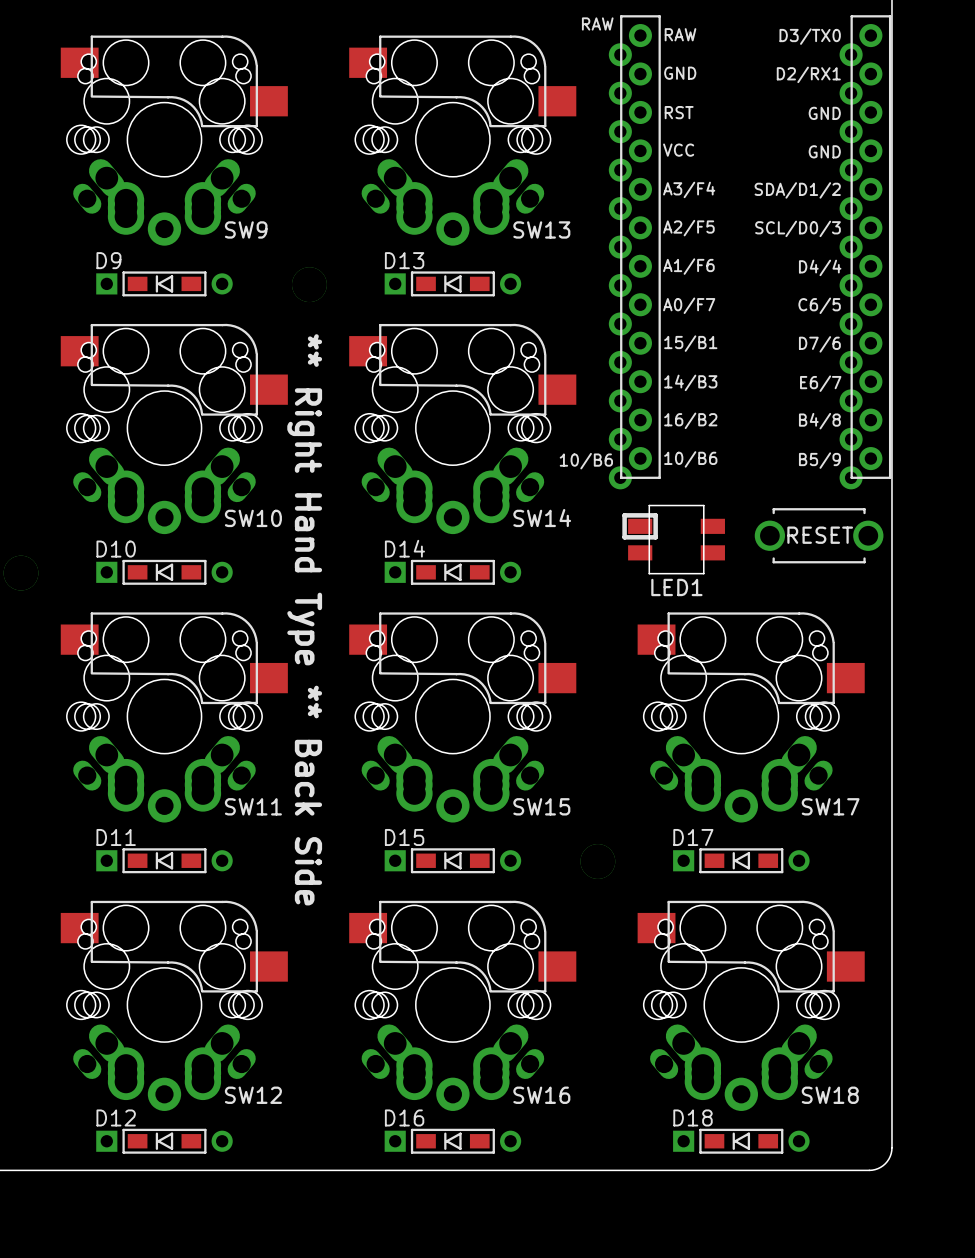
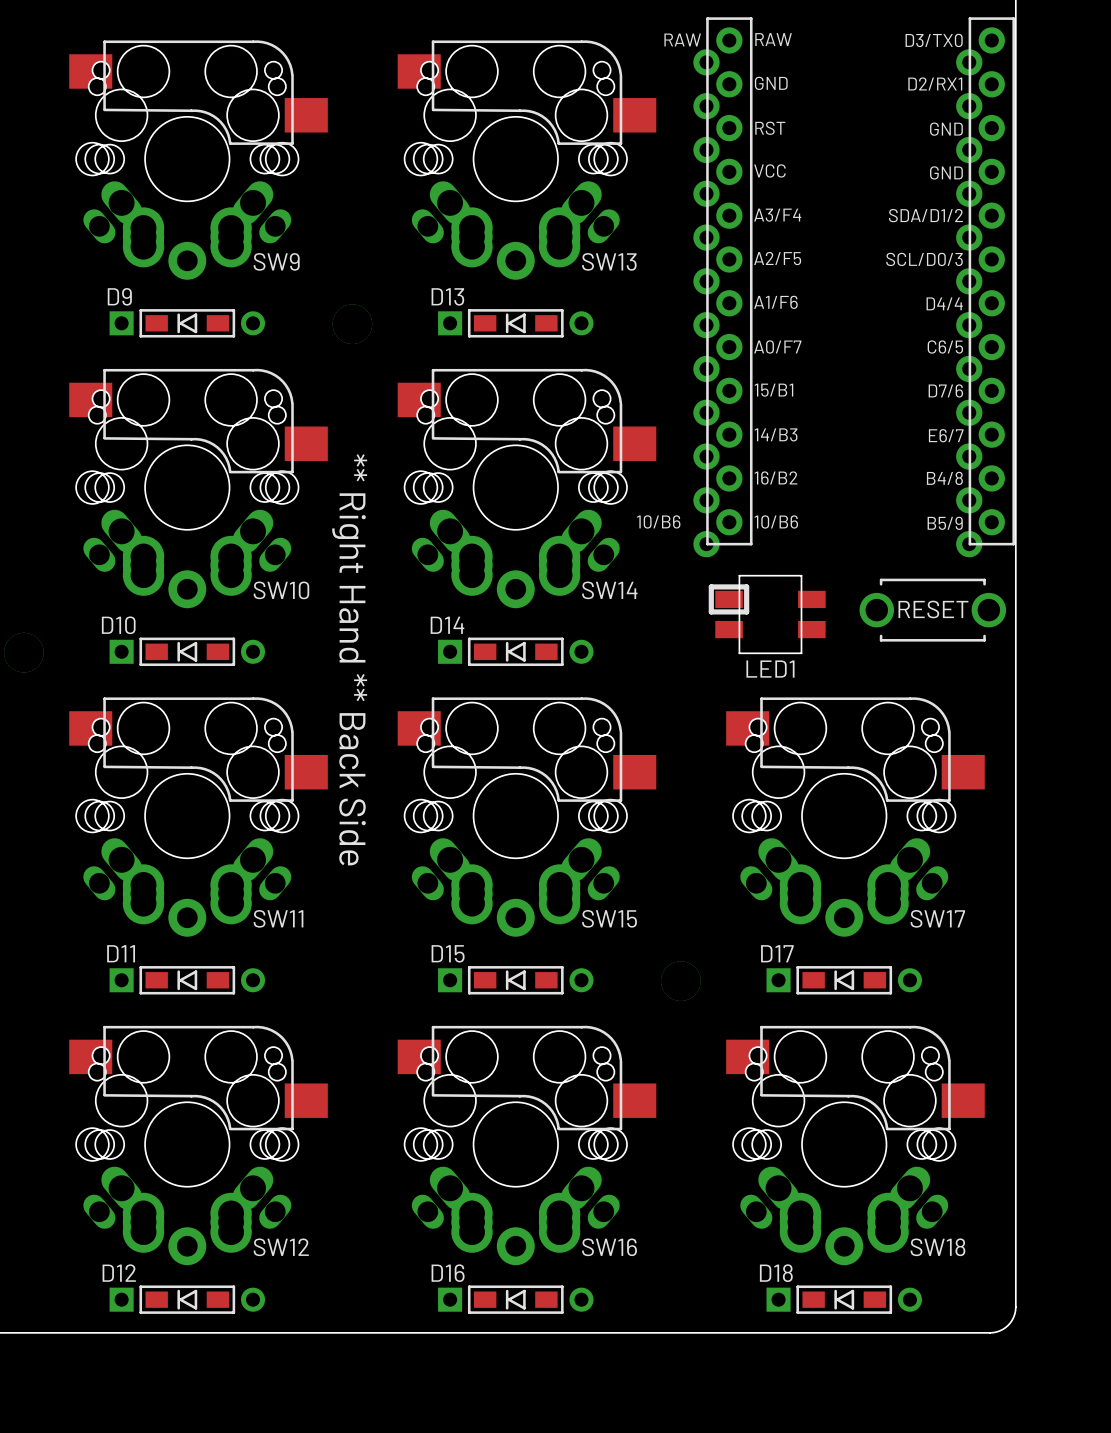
part footprint: [608, 15, 892, 490] -> [693, 17, 1015, 558]
D13 name position: D13 (404, 260) -> D13 (447, 296)
D14 name position: D14 (404, 548) -> D14 (447, 625)
D10 name position: D10 (116, 549) -> D10 (118, 625)
text: ** Right Hand Type ** Back Side (304, 619) -> ** Right Hand ** Back Side (349, 659)
D11 name position: D11 (116, 837) -> D11 (121, 953)
D15 name position: D15 (404, 837) -> D15 (448, 953)
D17 name position: D17 (693, 837) -> D17 (777, 953)
D12 name position: D12 (116, 1117) -> D12 (119, 1273)
D16 name position: D16 (404, 1117) -> D16 (448, 1273)
D18 name position: D18 (693, 1117) -> D18 (776, 1273)

